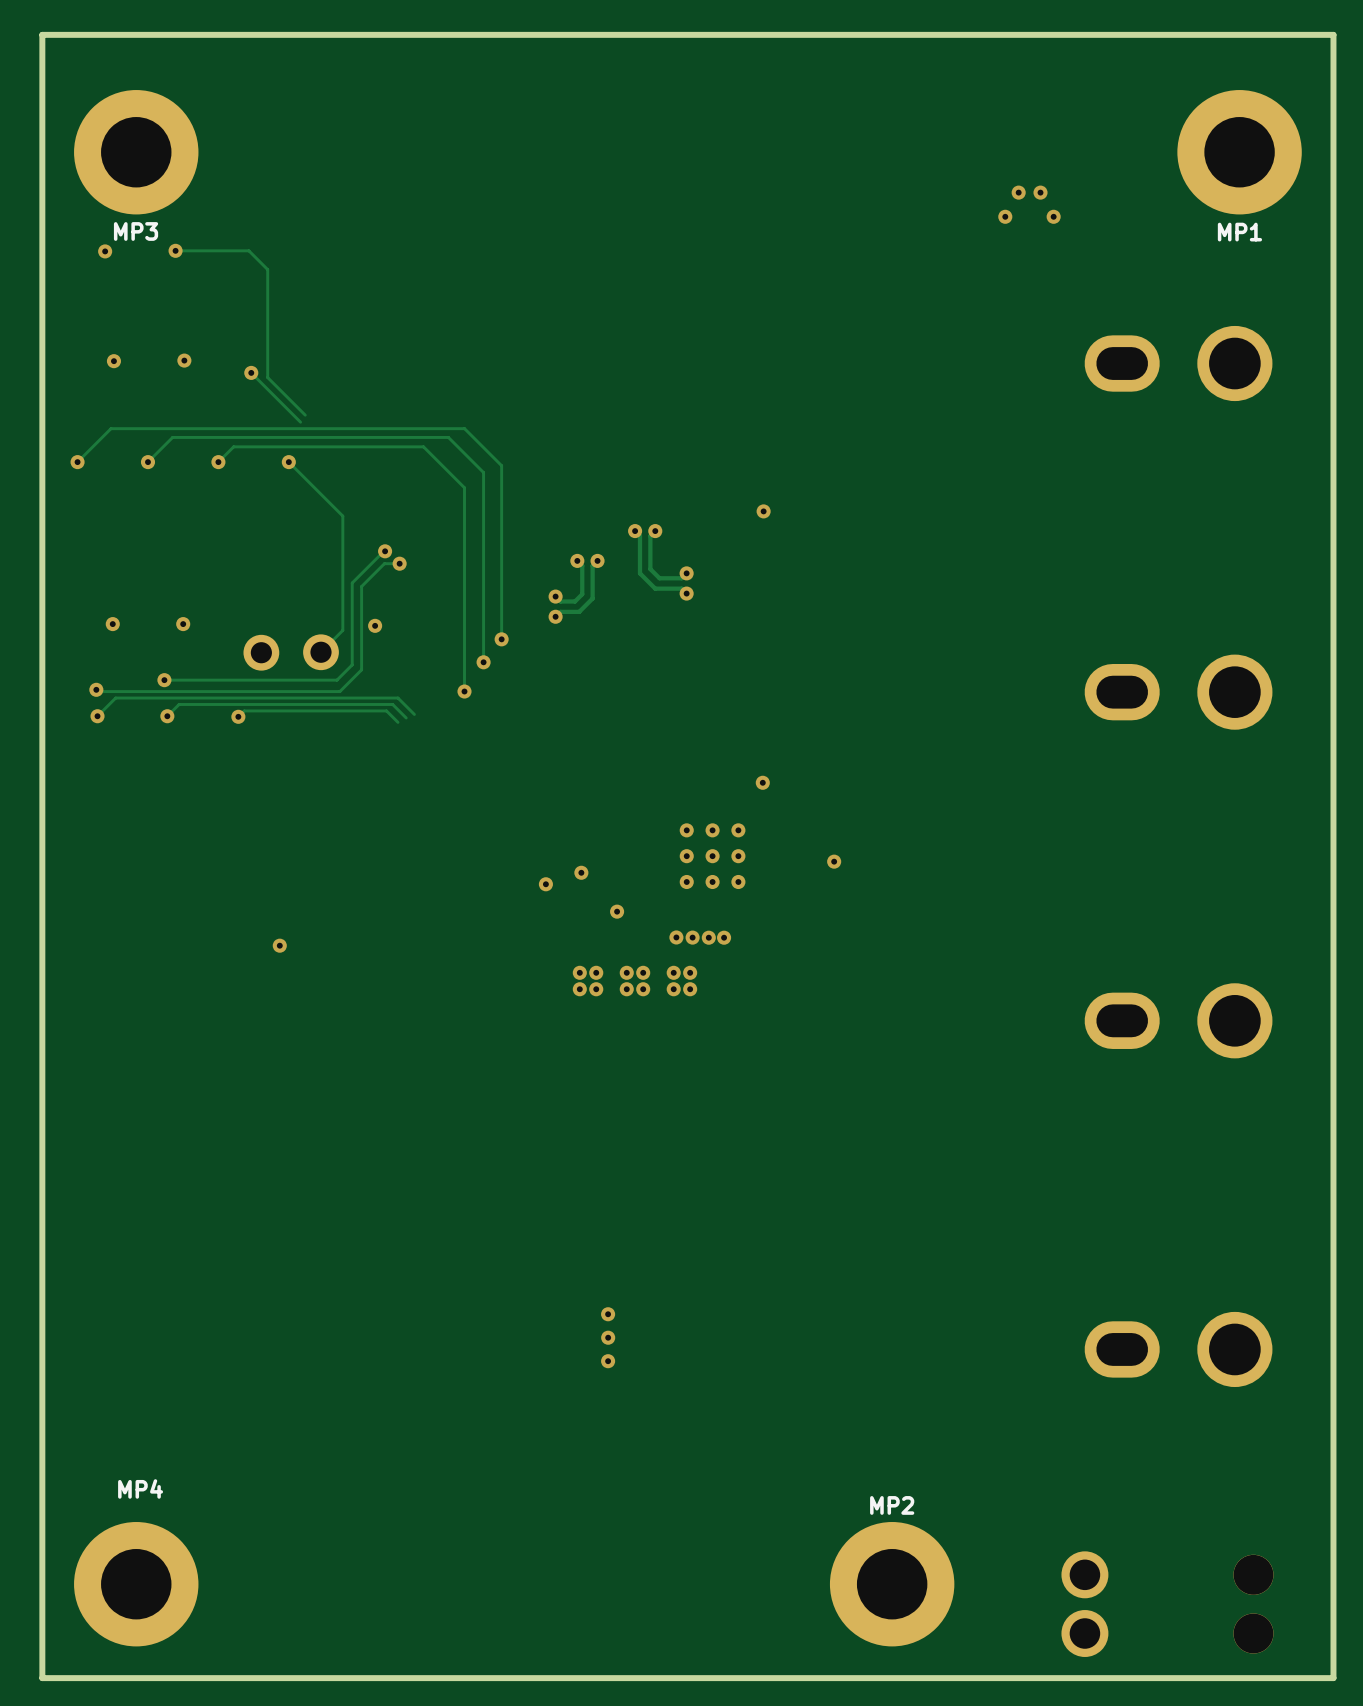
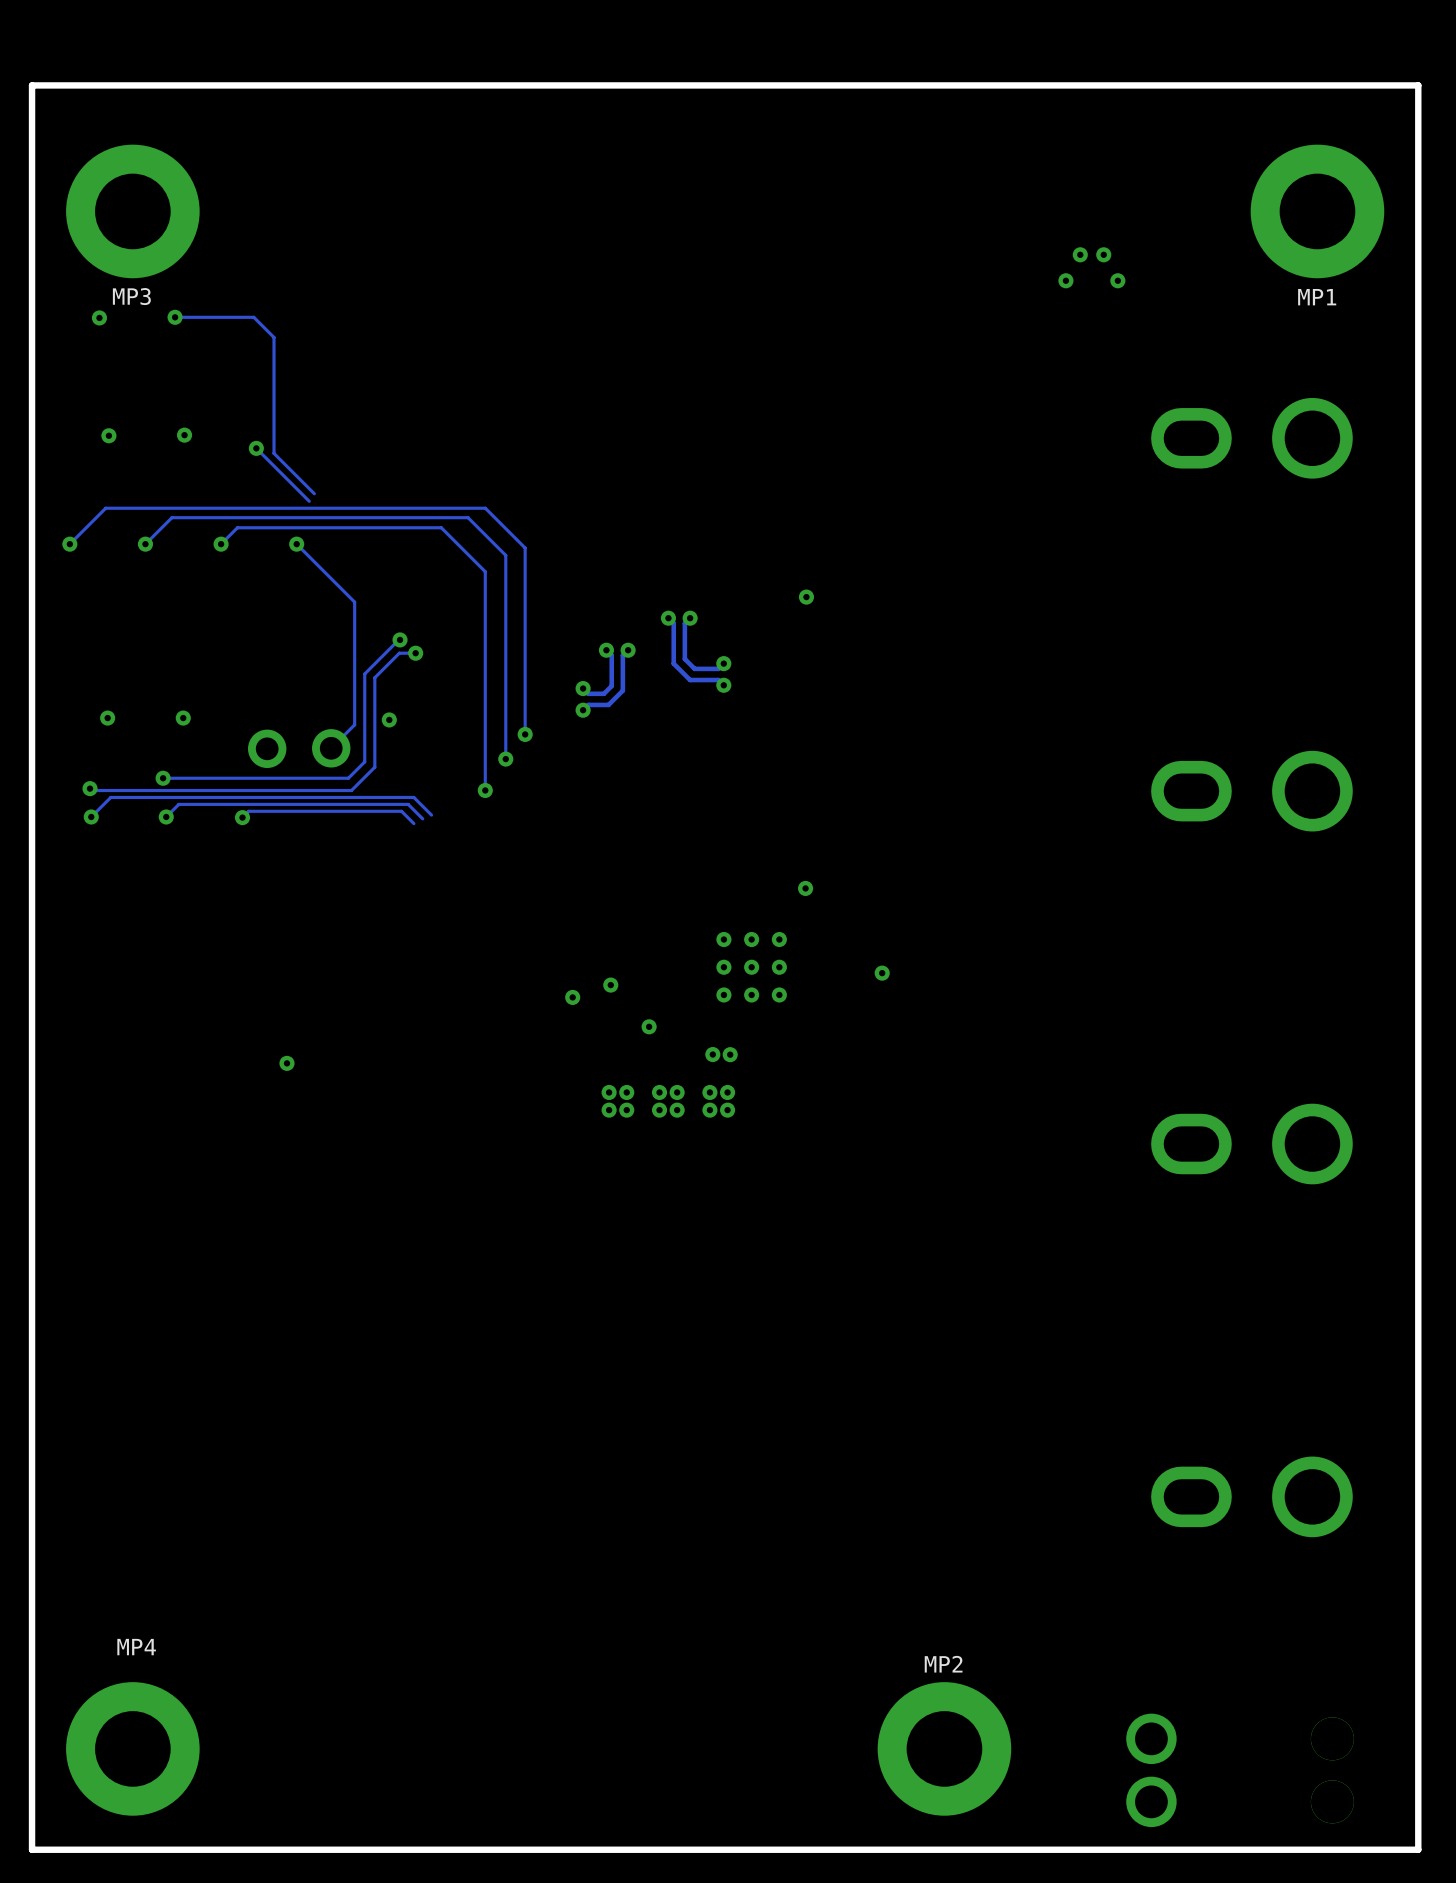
via: (708, 937) -> none
via: (724, 937) -> none
via: (608, 1314) -> none
via: (608, 1337) -> none
via: (608, 1361) -> none

